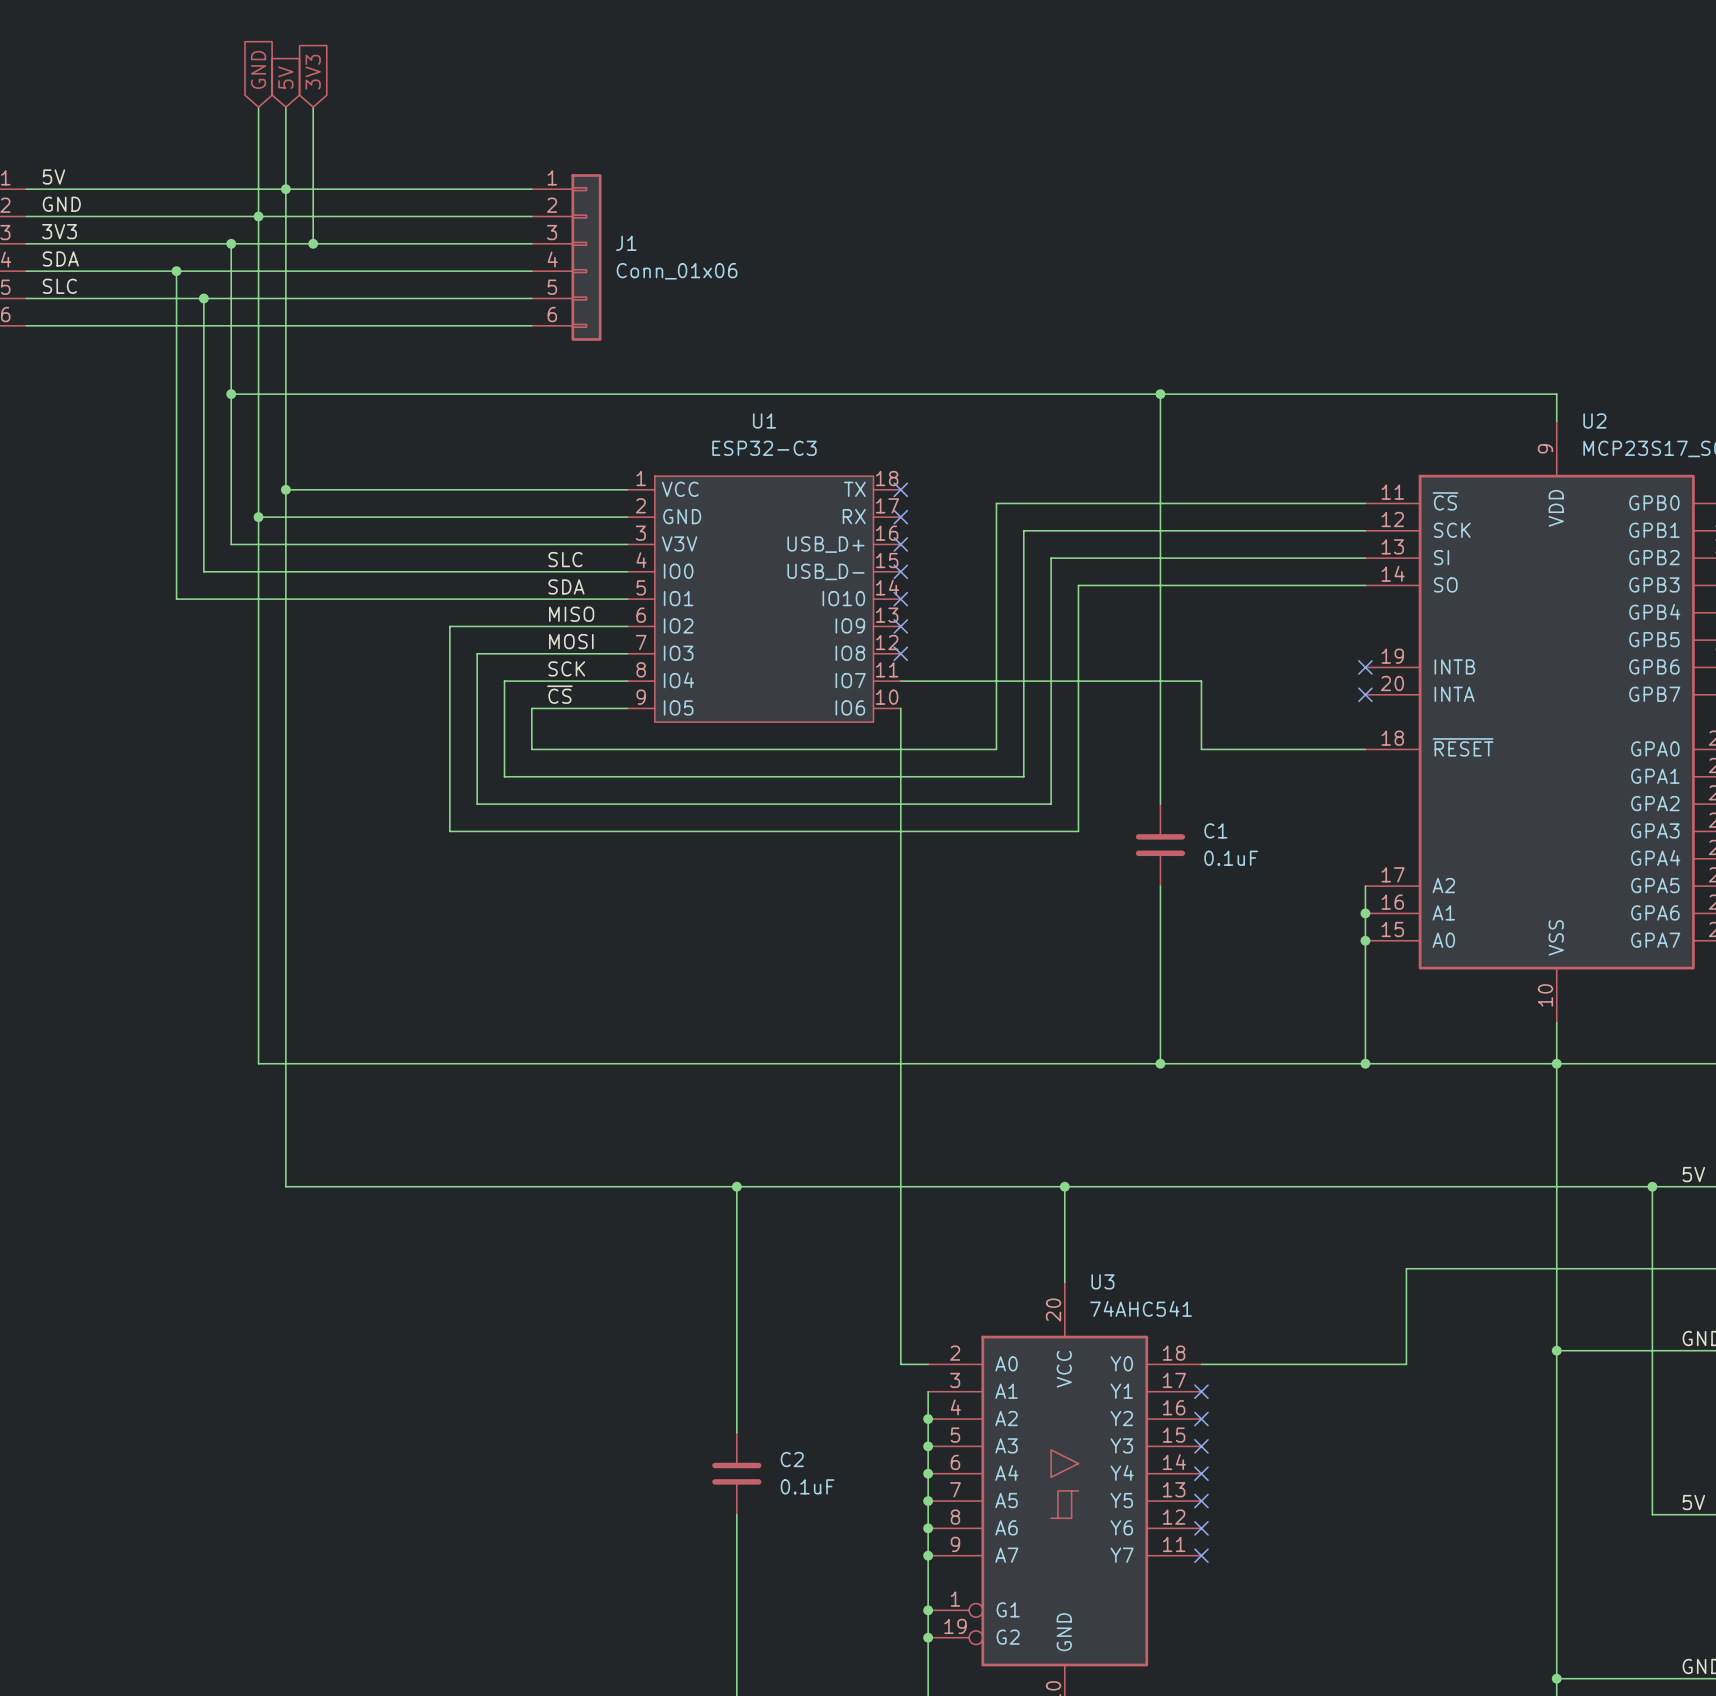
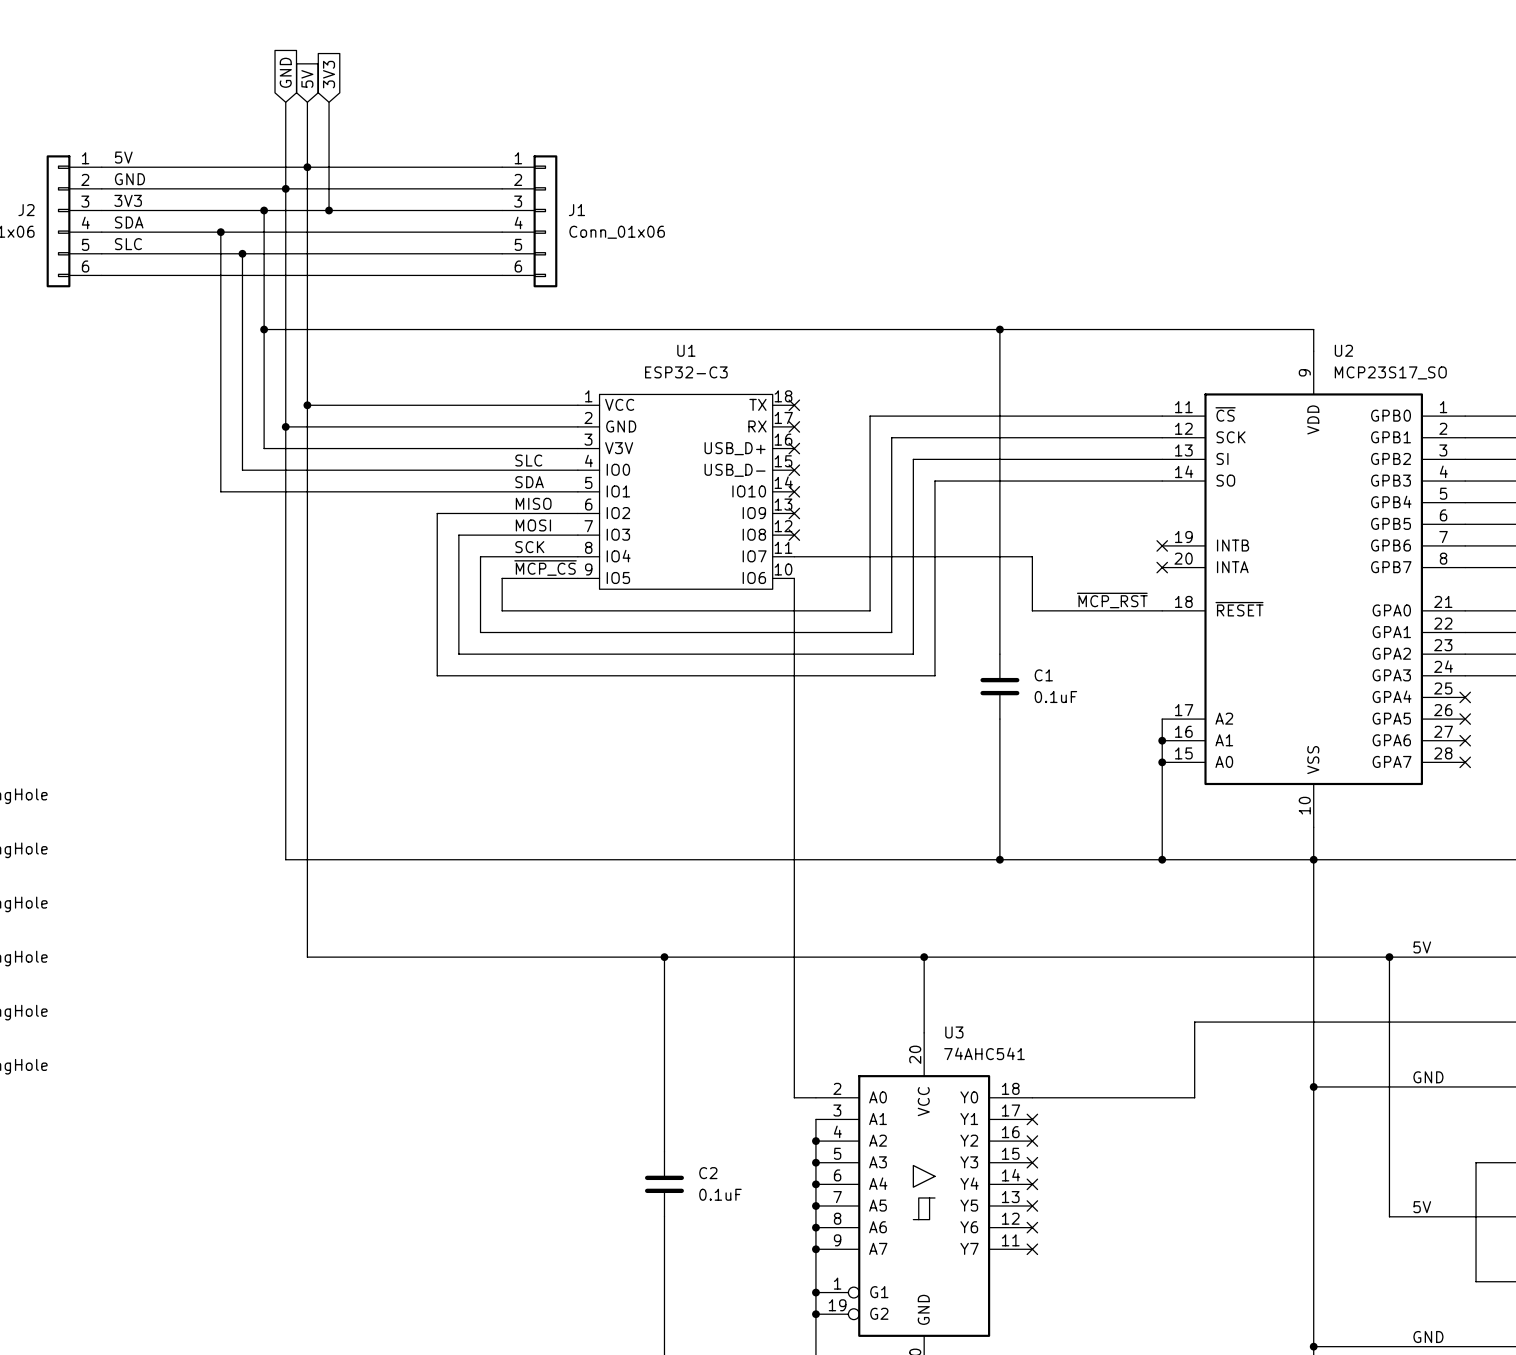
label: ~{CS} (559, 694) -> ~{MCP_CS} (545, 568)
label: none -> ~{MCP_RST} (1112, 600)

